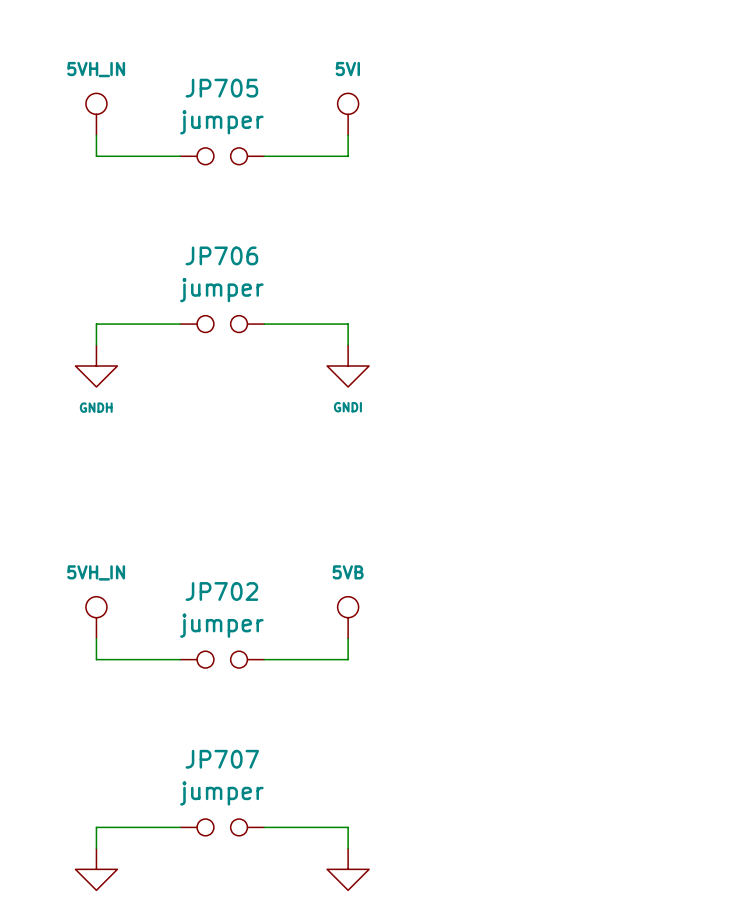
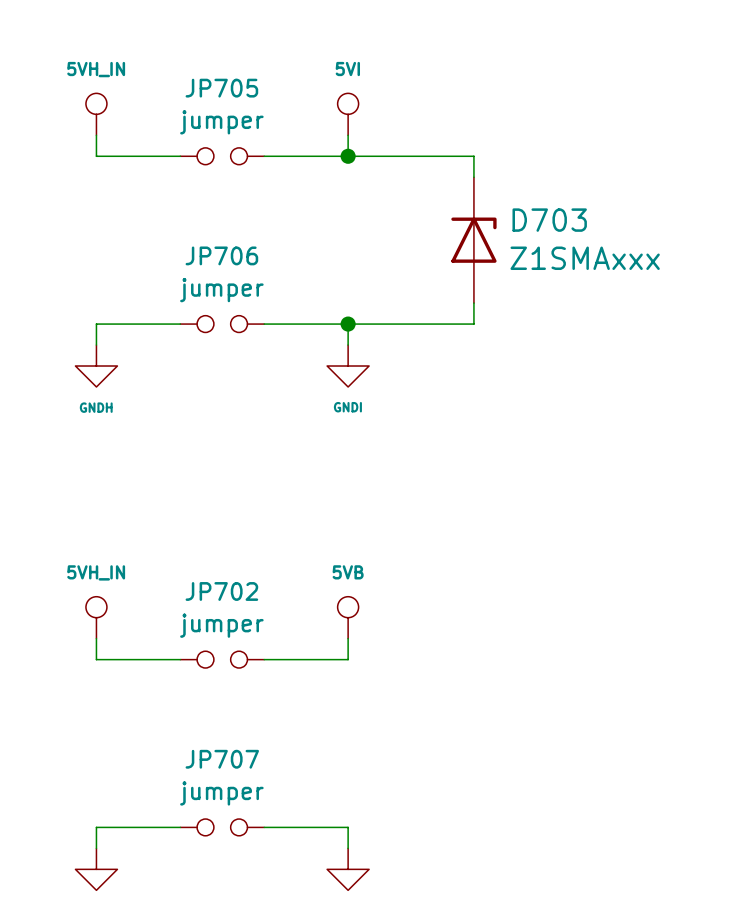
wire: none -> (348, 156) (473, 156) (473, 177)
junction: none -> (348, 156)
D703: none -> Z1SMAxxx (473, 240)
wire: none -> (473, 303) (473, 324) (348, 324)
junction: none -> (348, 324)

